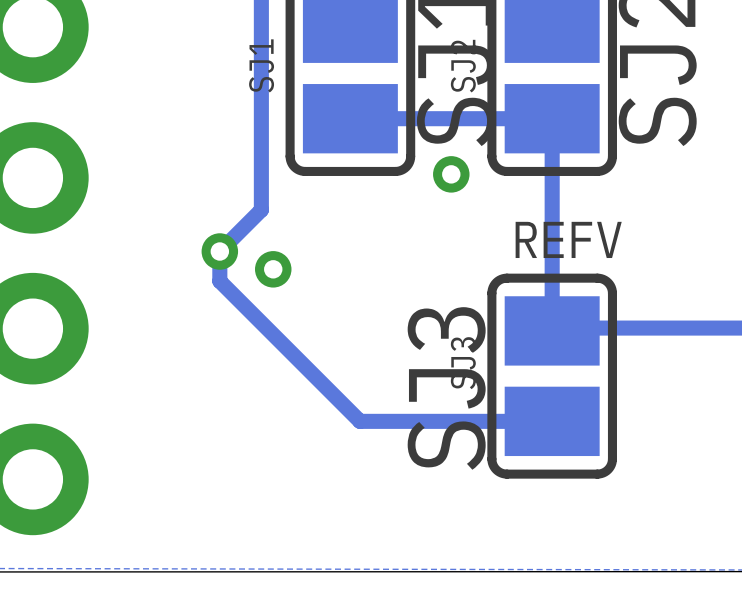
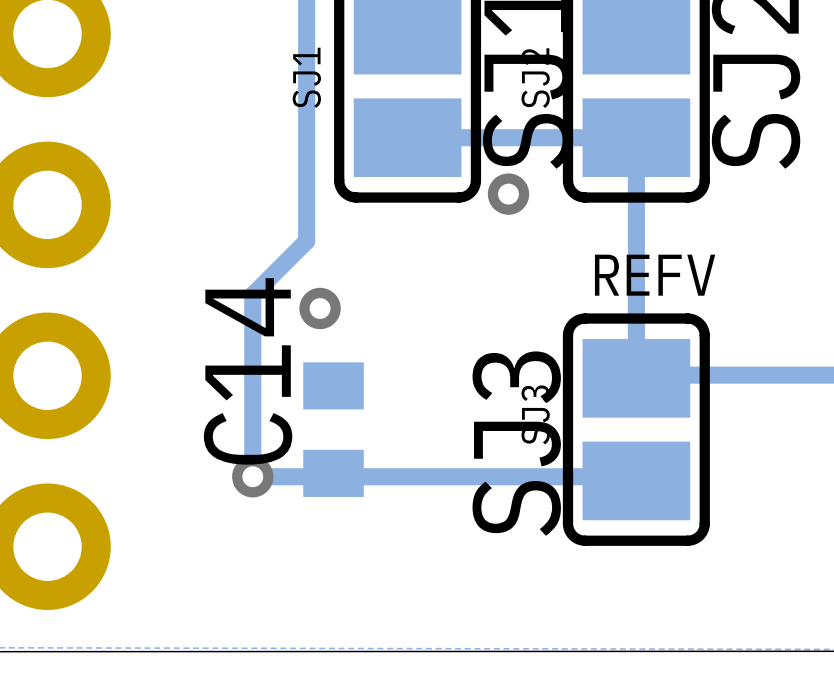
via position: (451, 174) -> (508, 194)
track: (219, 251) (219, 281) (360, 421) (552, 421) -> (259, 288) (252, 295) (252, 476) (636, 476)
via: (219, 251) -> none
C14: none -> (333, 429)
via: none -> (252, 476)

